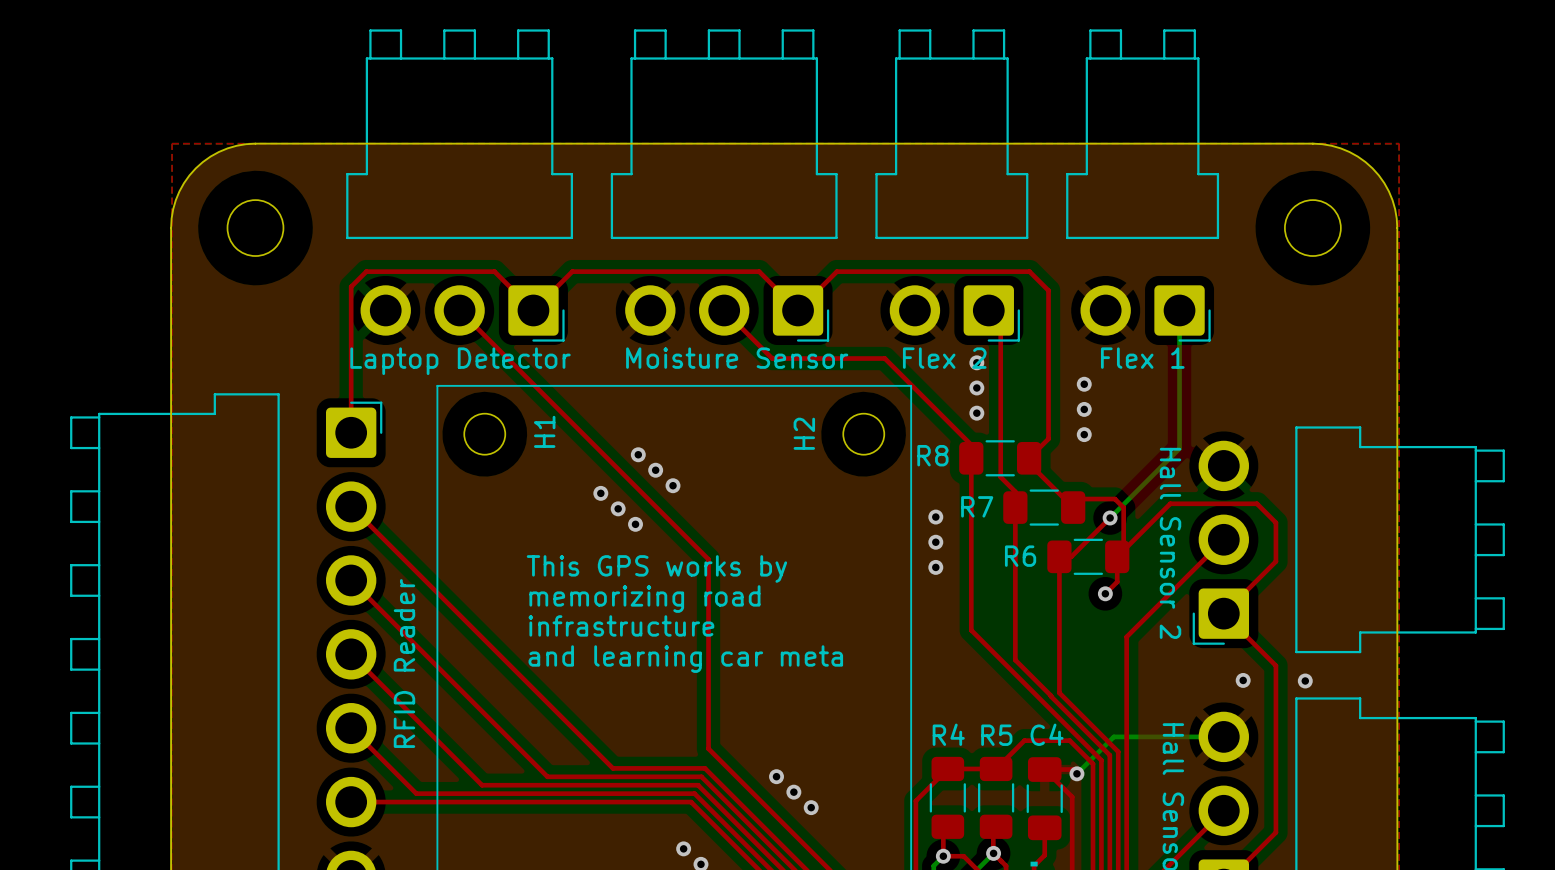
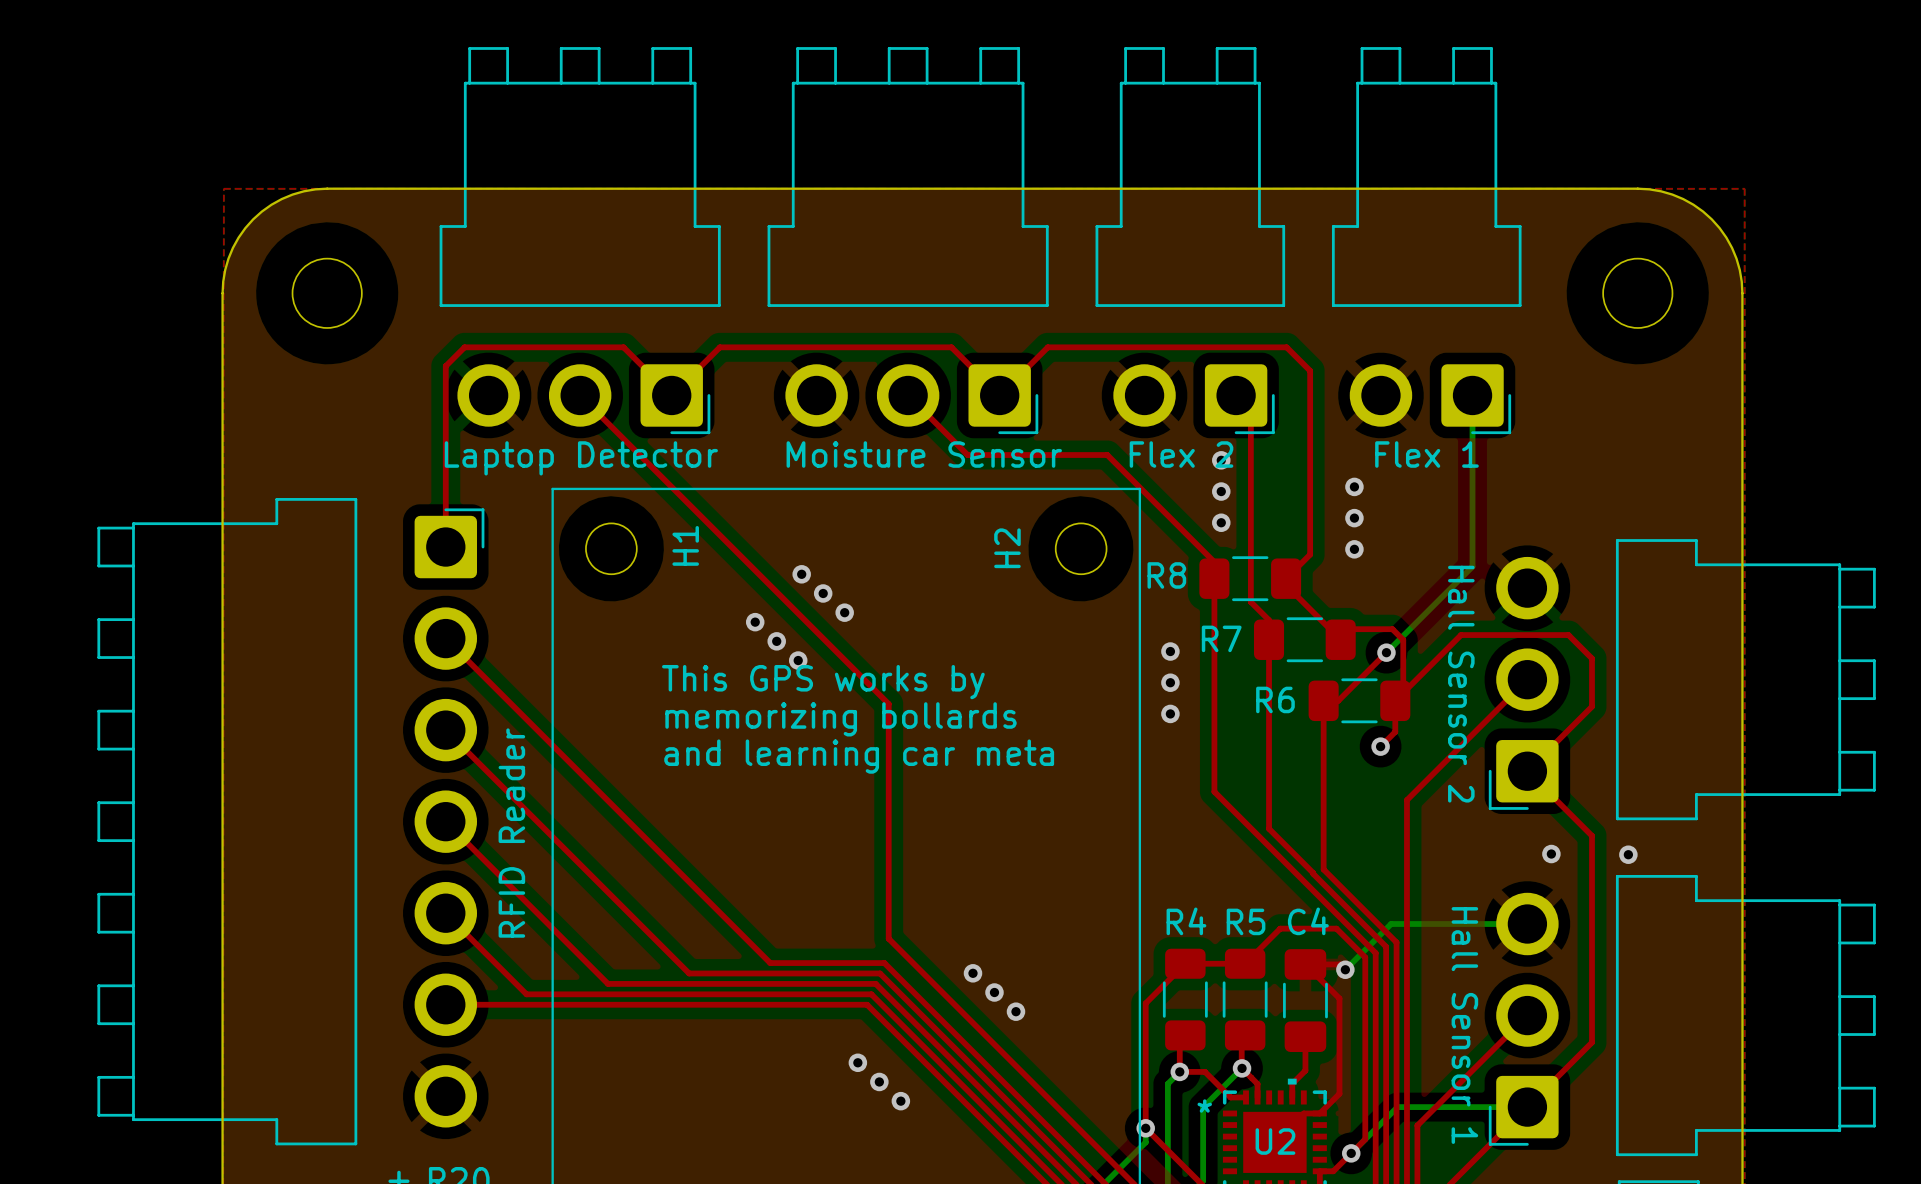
text: none -> This GPS works by (823, 682)
text: This GPS works by (656, 568) -> memorizing bollards (841, 719)
text: memorizing road (644, 599) -> and learning car meta (859, 756)
text: infrastructure (621, 625) -> none
text: and learning car meta (685, 659) -> none

